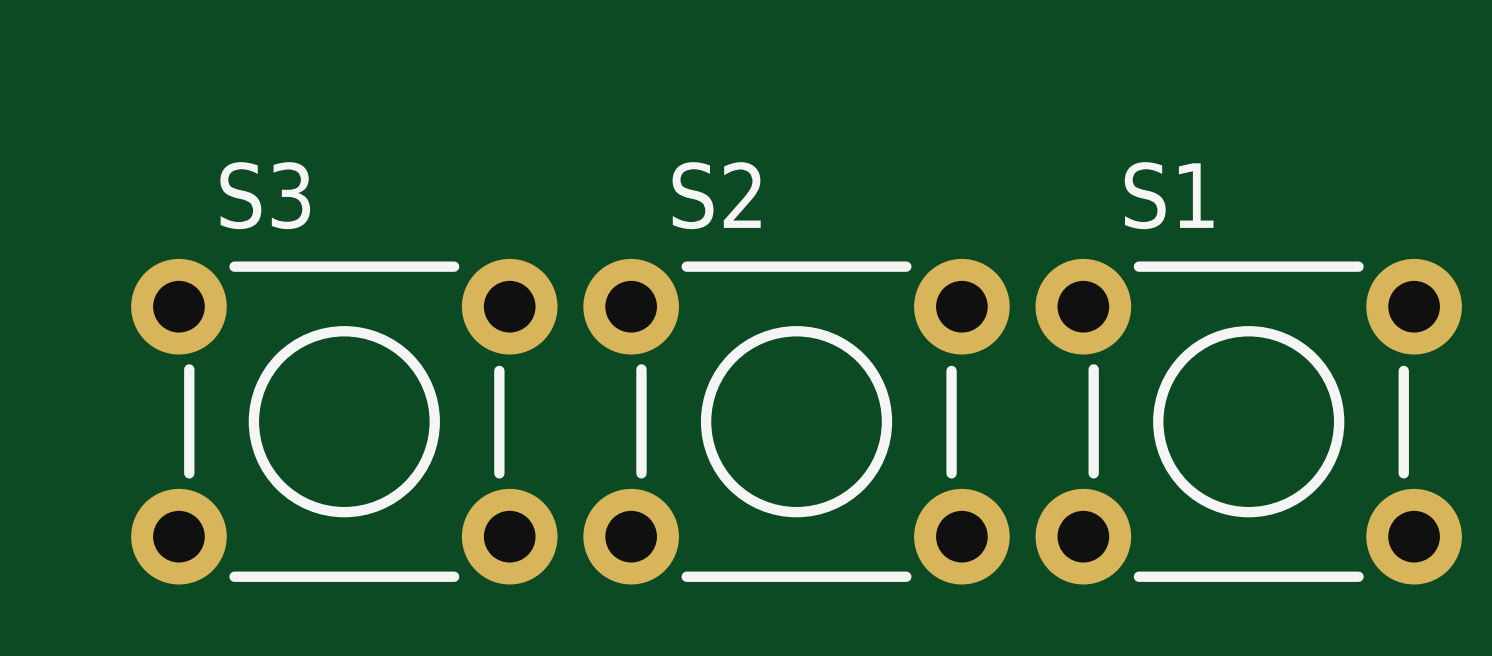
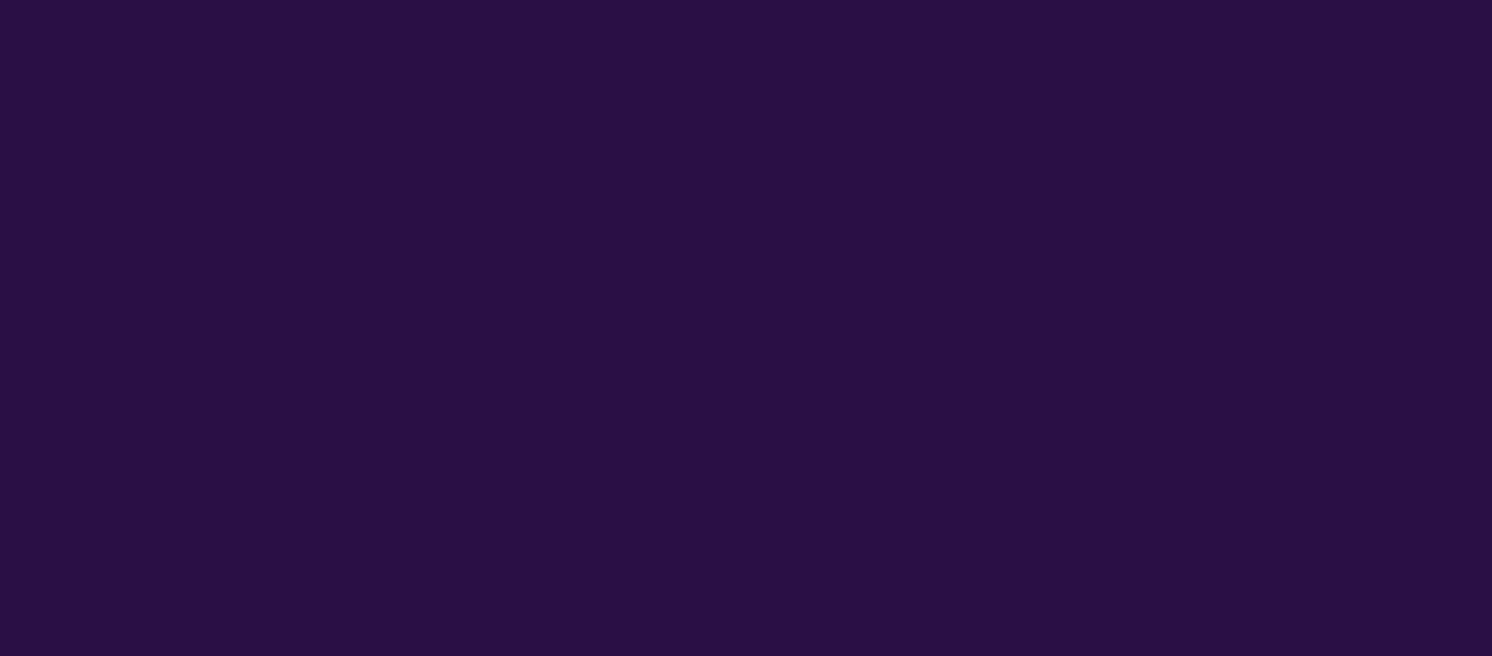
S3: (344, 421) -> none
S2: (796, 421) -> none
S1: (1248, 421) -> none

